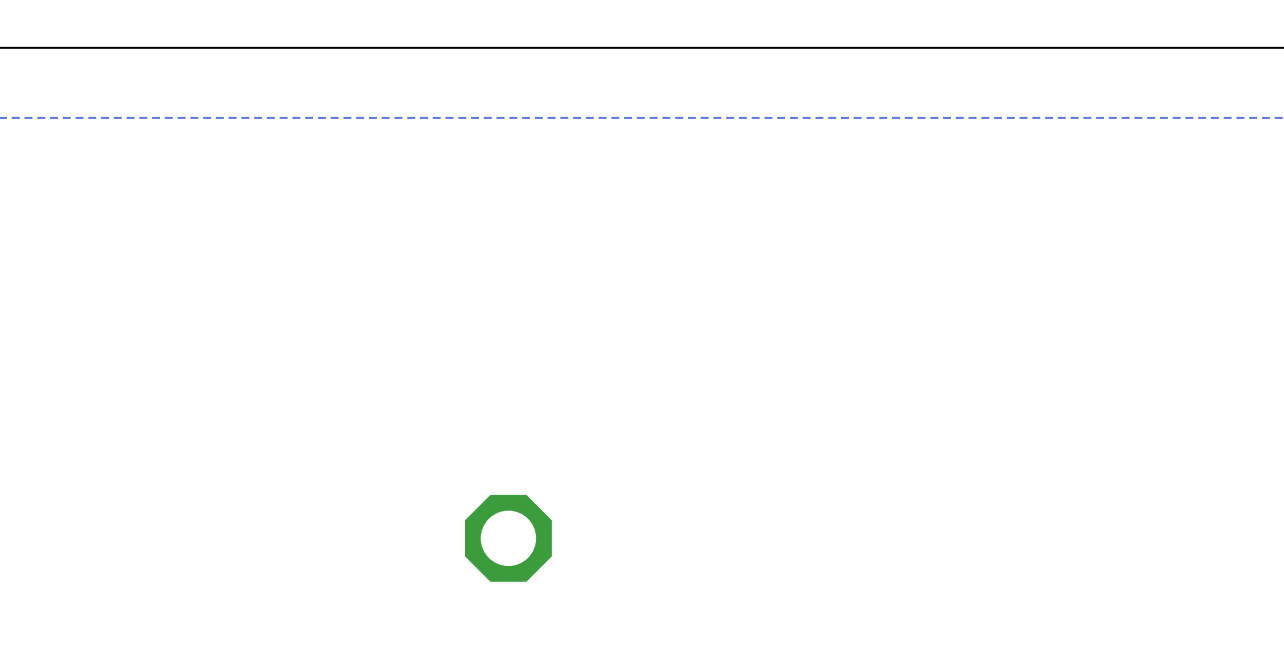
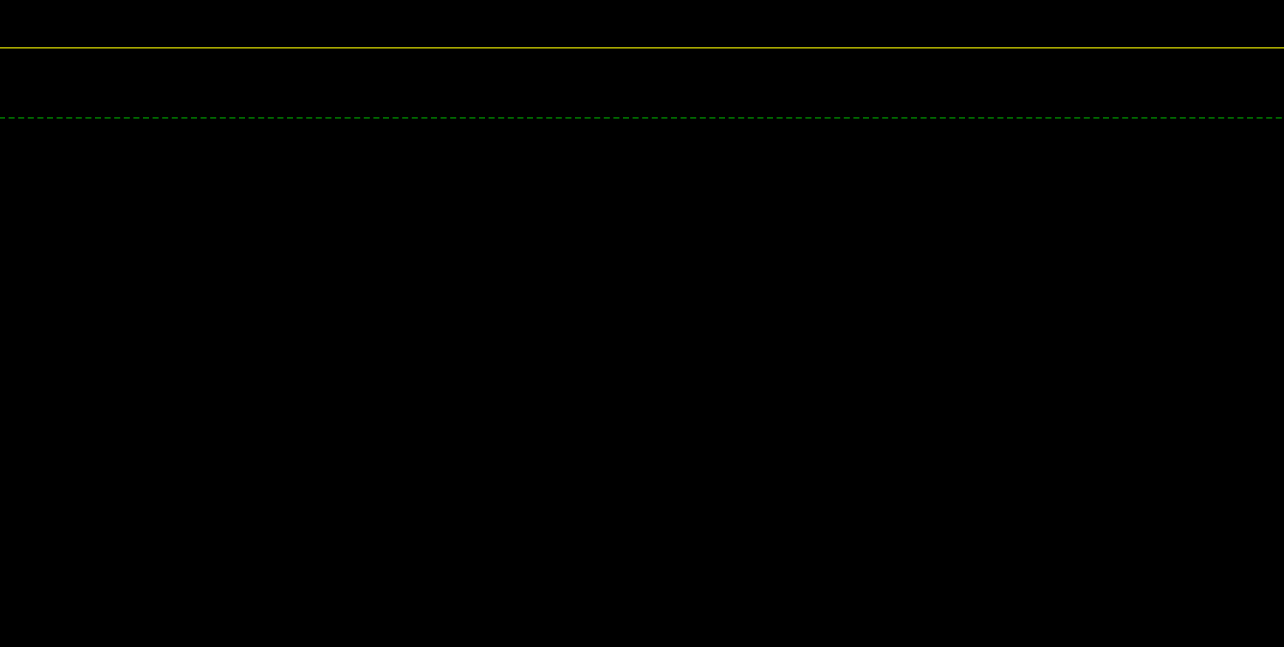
part: (508, 538) -> none

